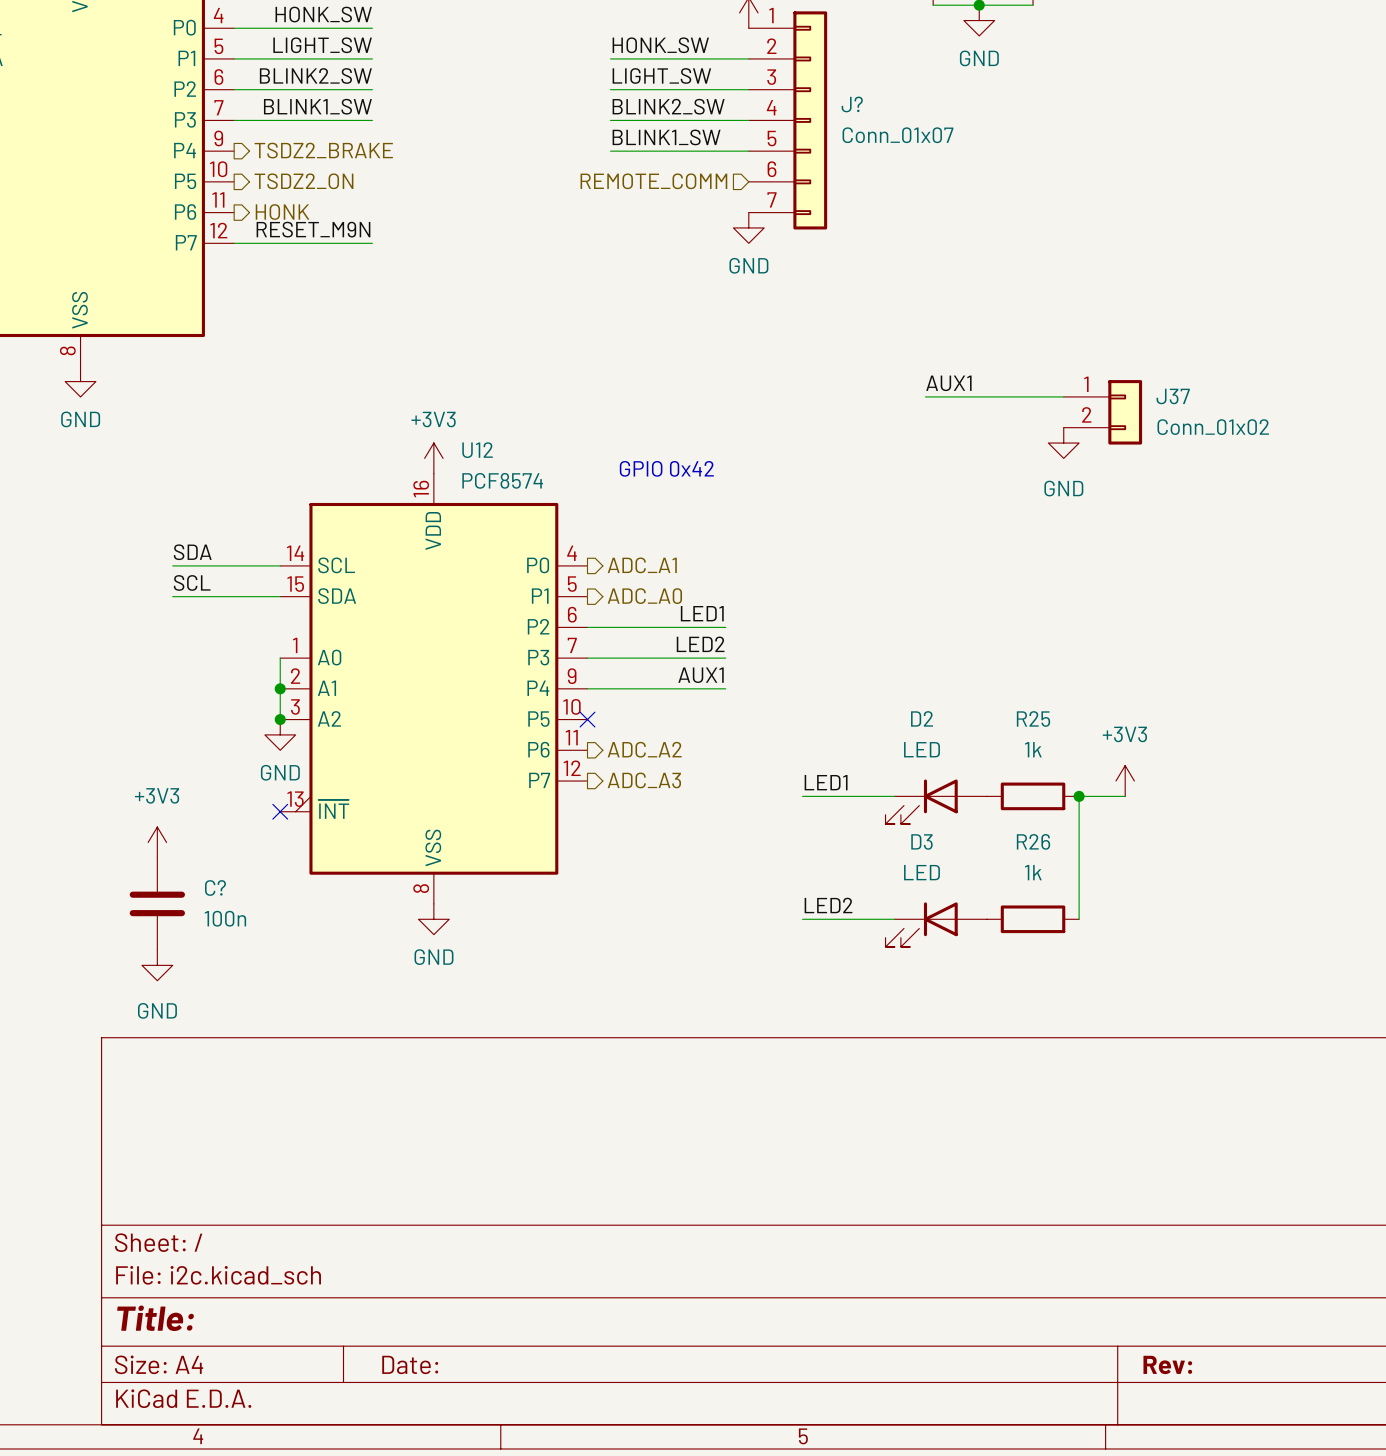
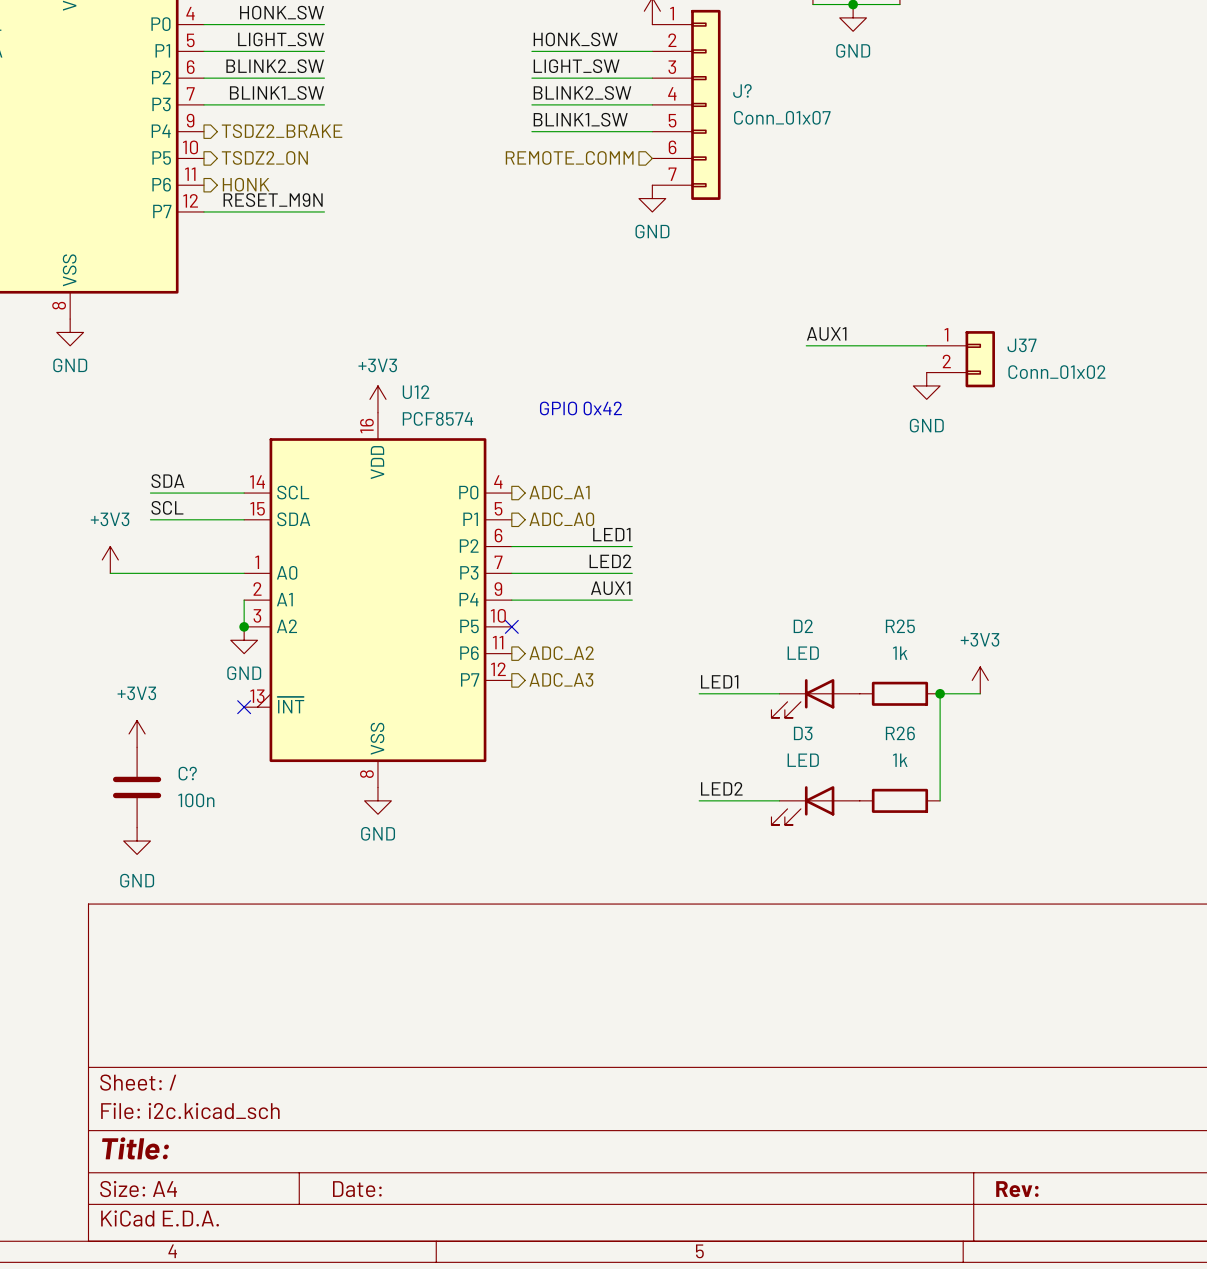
power symbol: none -> +3V3 (110, 559)
wire: (280, 658) (280, 688) -> (244, 573) (110, 573)
junction: (280, 688) -> none

